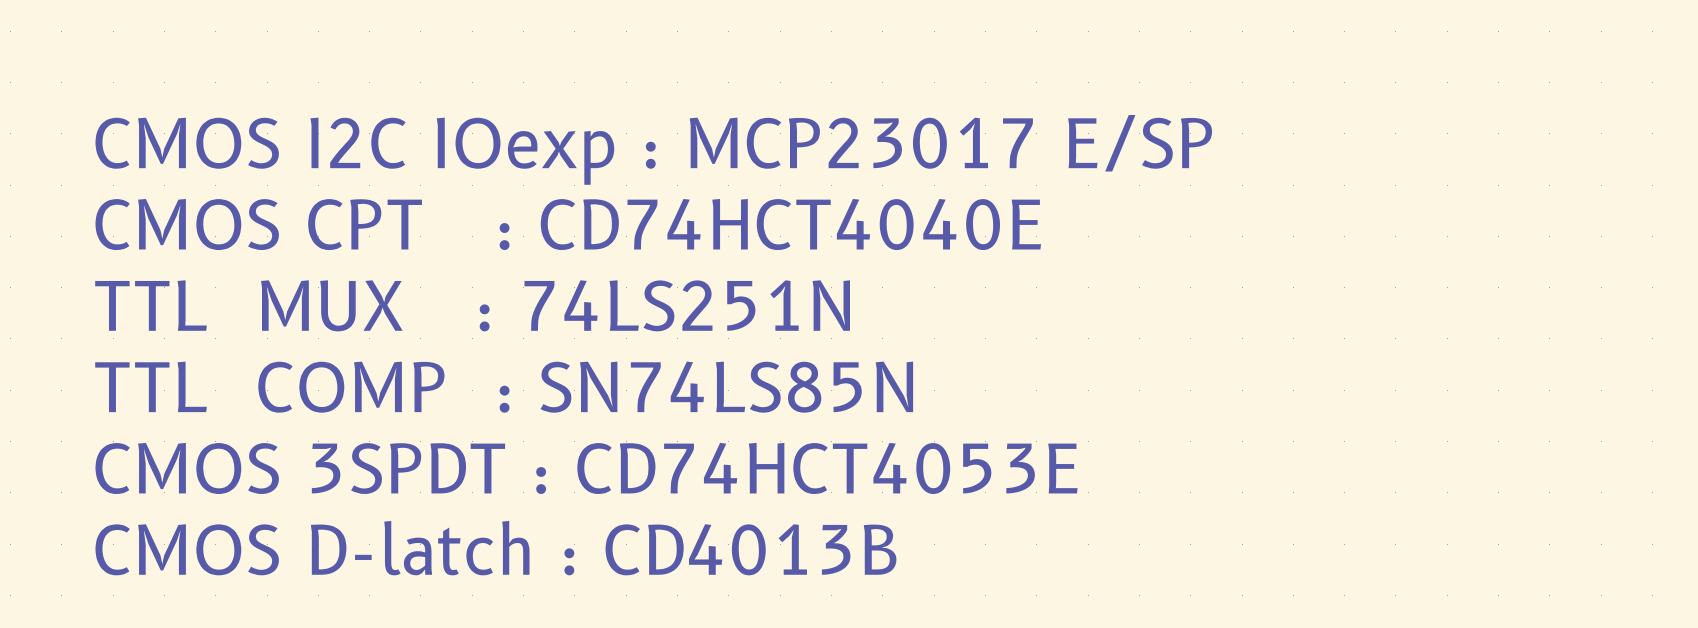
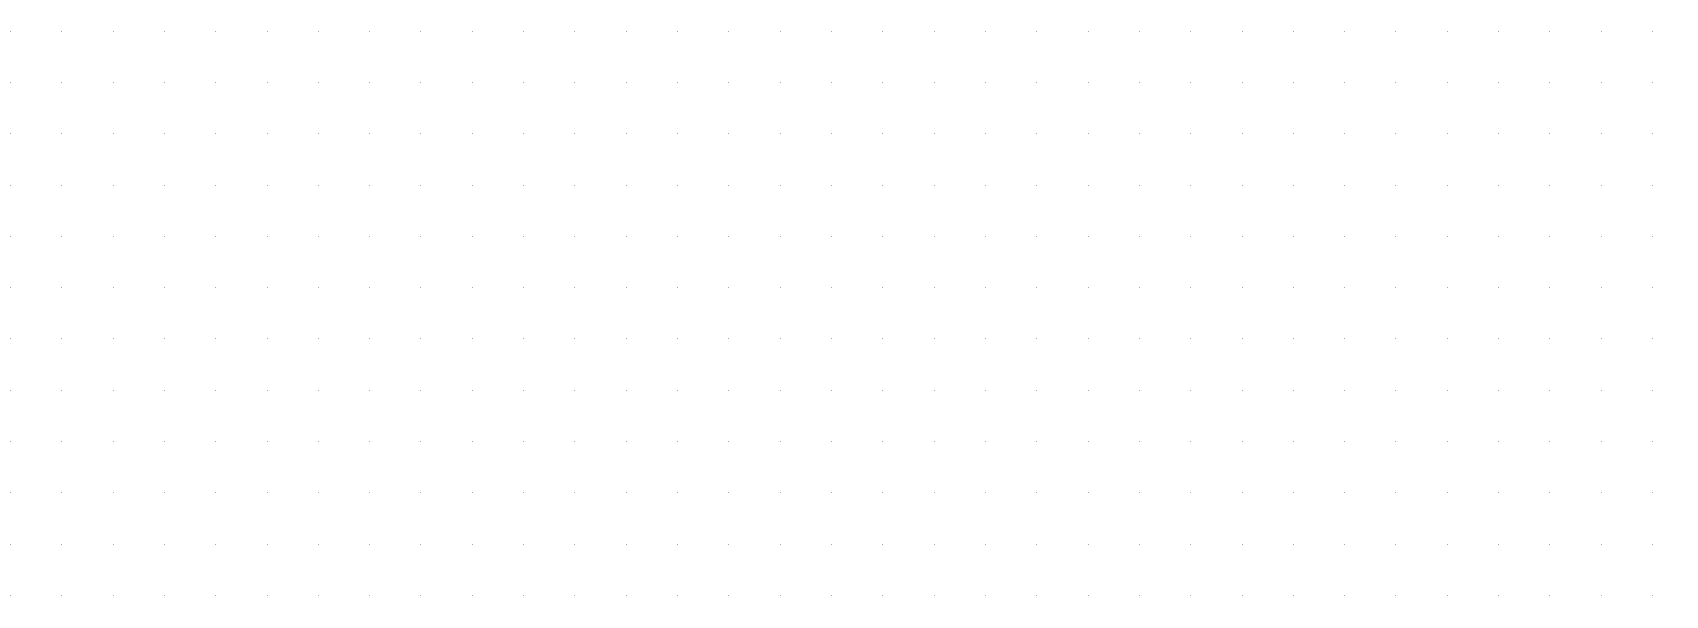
text: CMOS I2C IOexp : MCP23017 E/SP (653, 149) -> none
text: CMOS CPT : CD74HCT4040E (568, 224) -> none
text: TTL MUX : 74LS251N (472, 305) -> none
text: TTL COMP : SN74LS85N (504, 387) -> none
text: CMOS 3SPDT : CD74HCT4053E (586, 468) -> none
text: CMOS D-latch : CD4013B (495, 548) -> none

